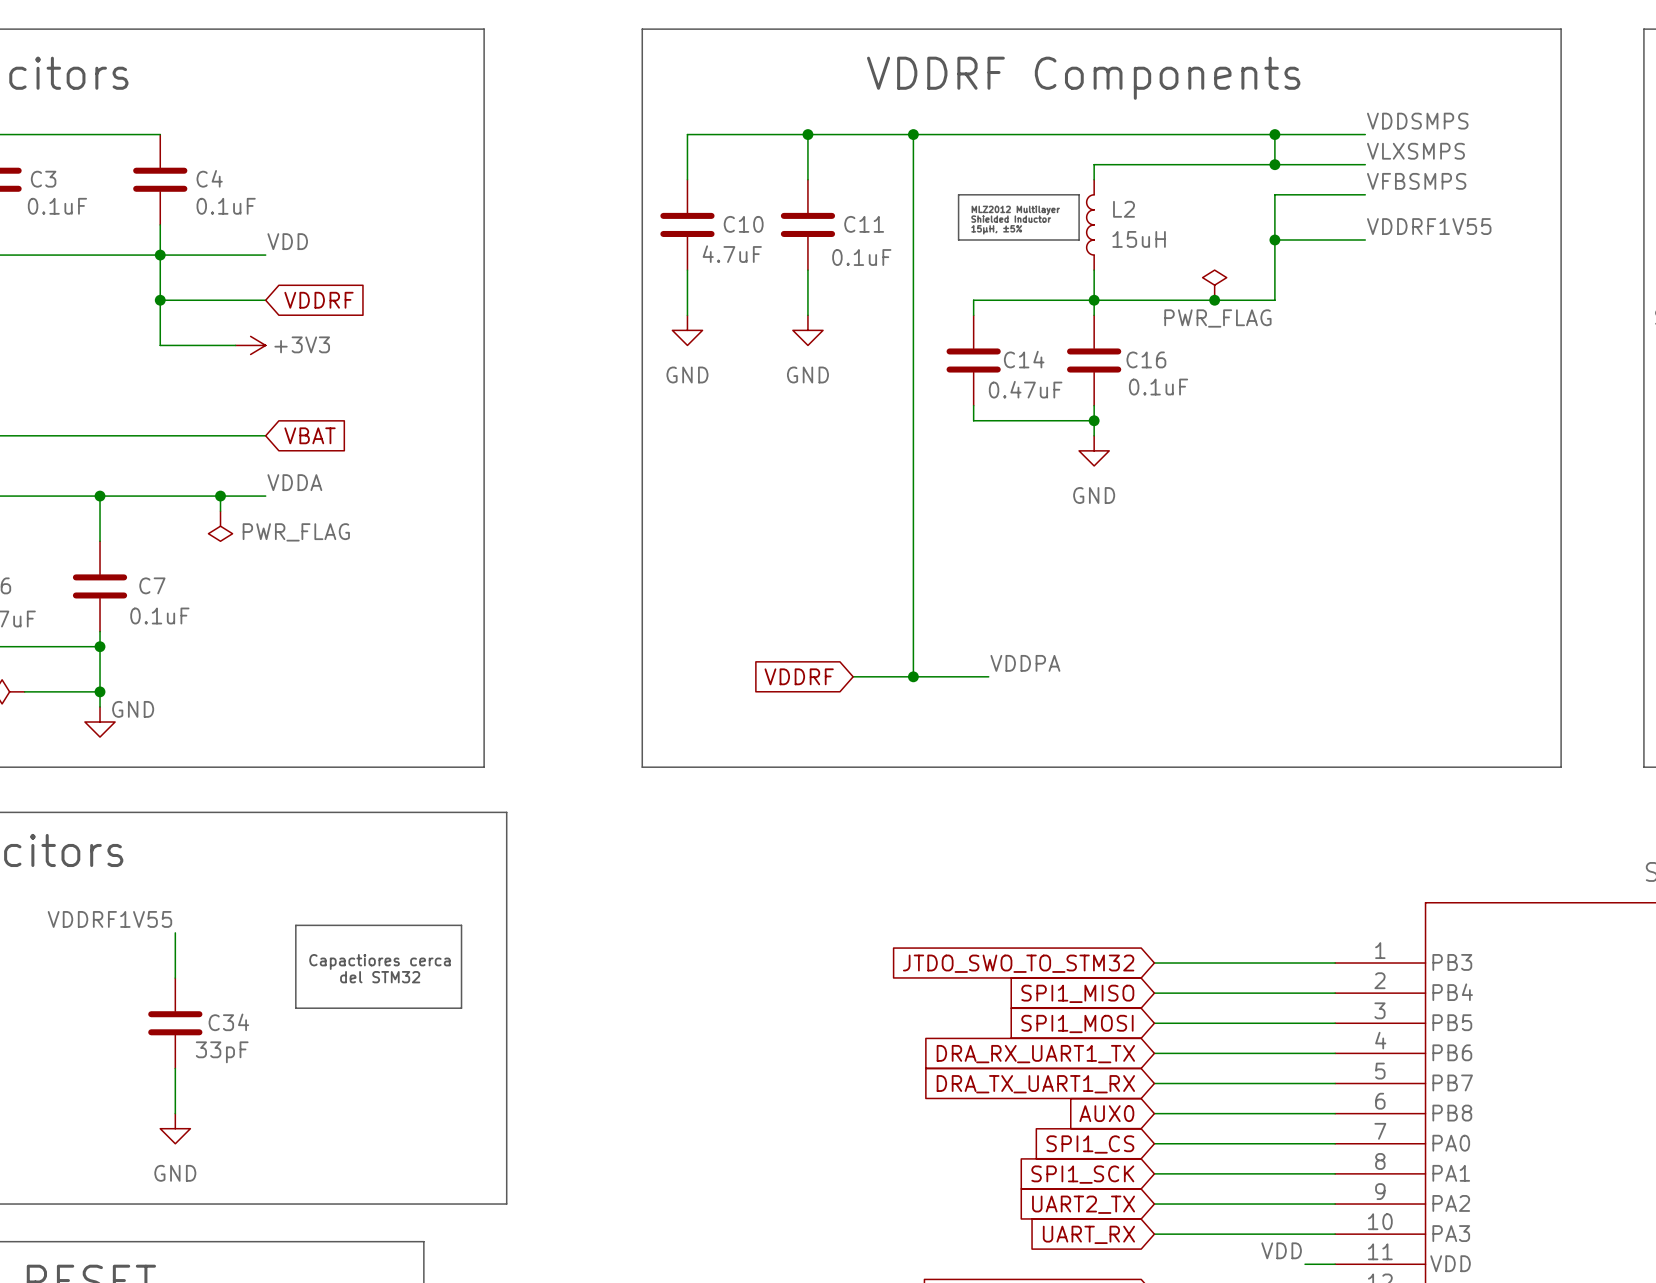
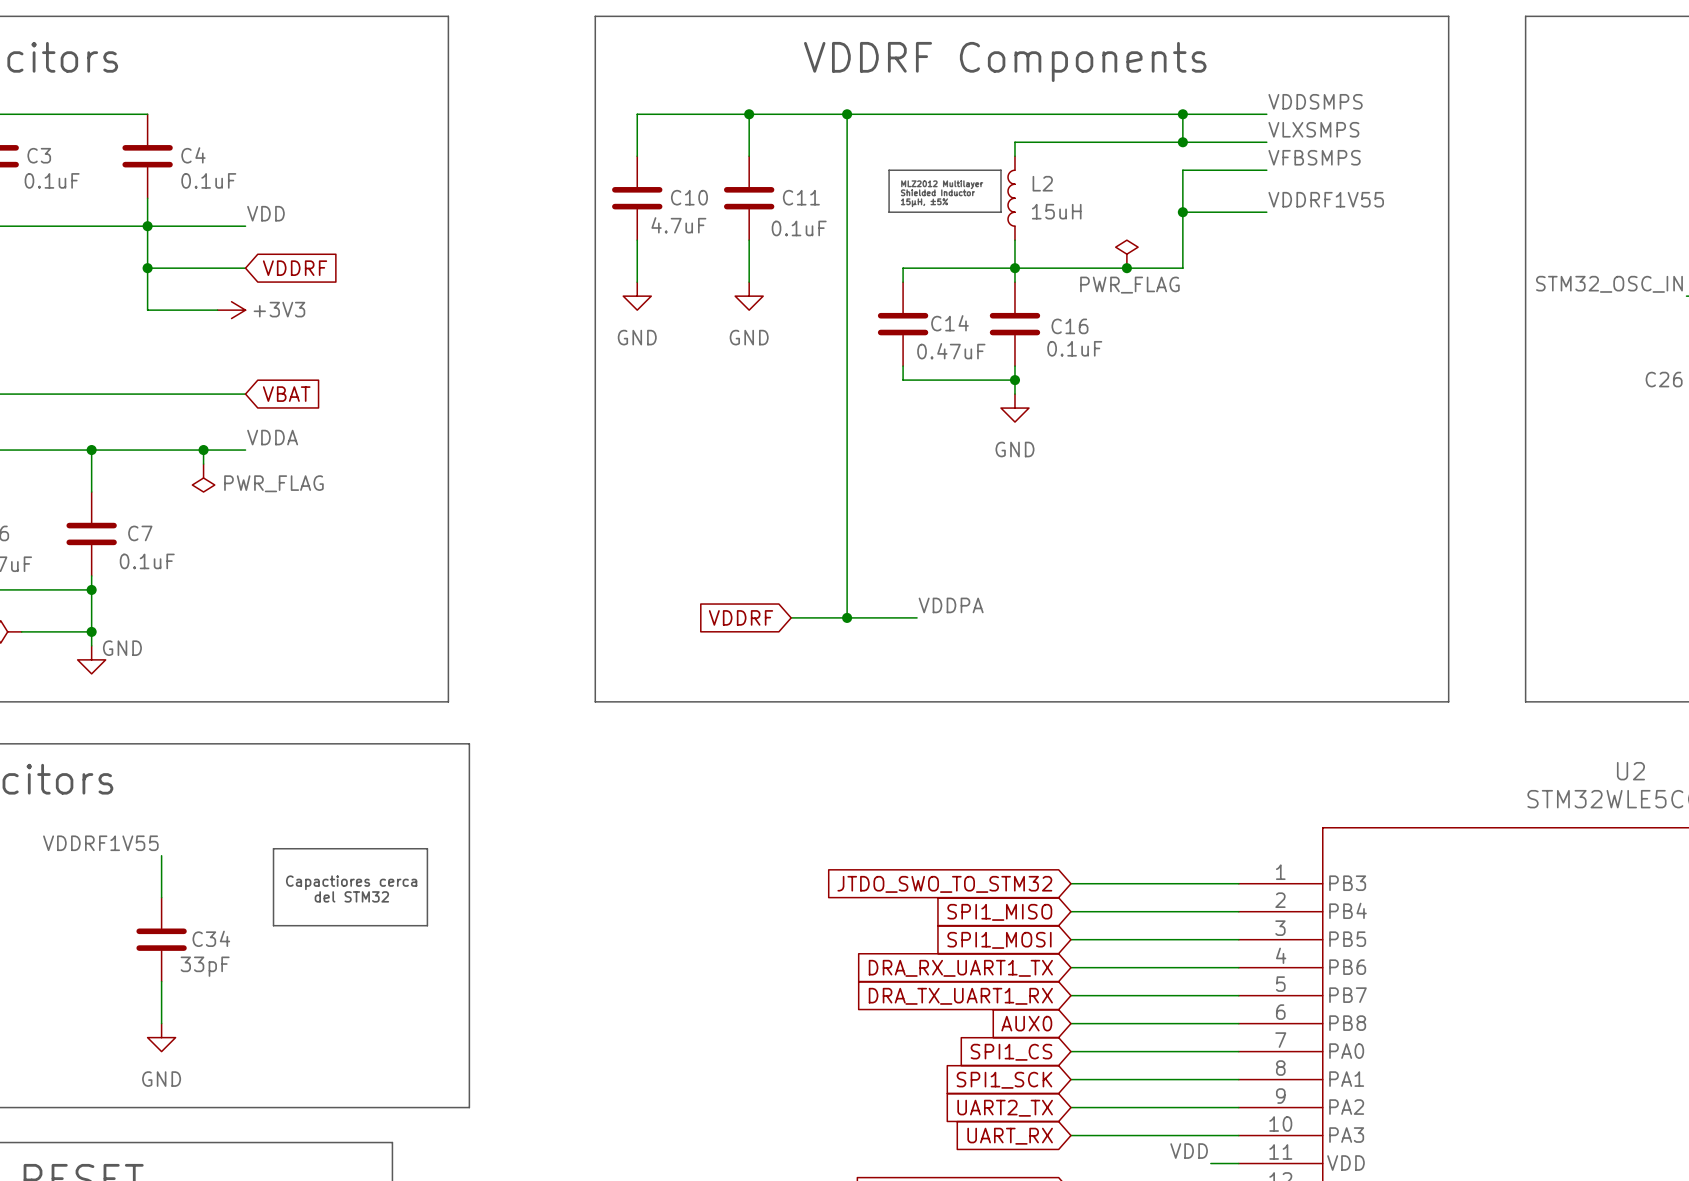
C16 name position: C16 (1146, 359) -> C16 (1069, 326)

